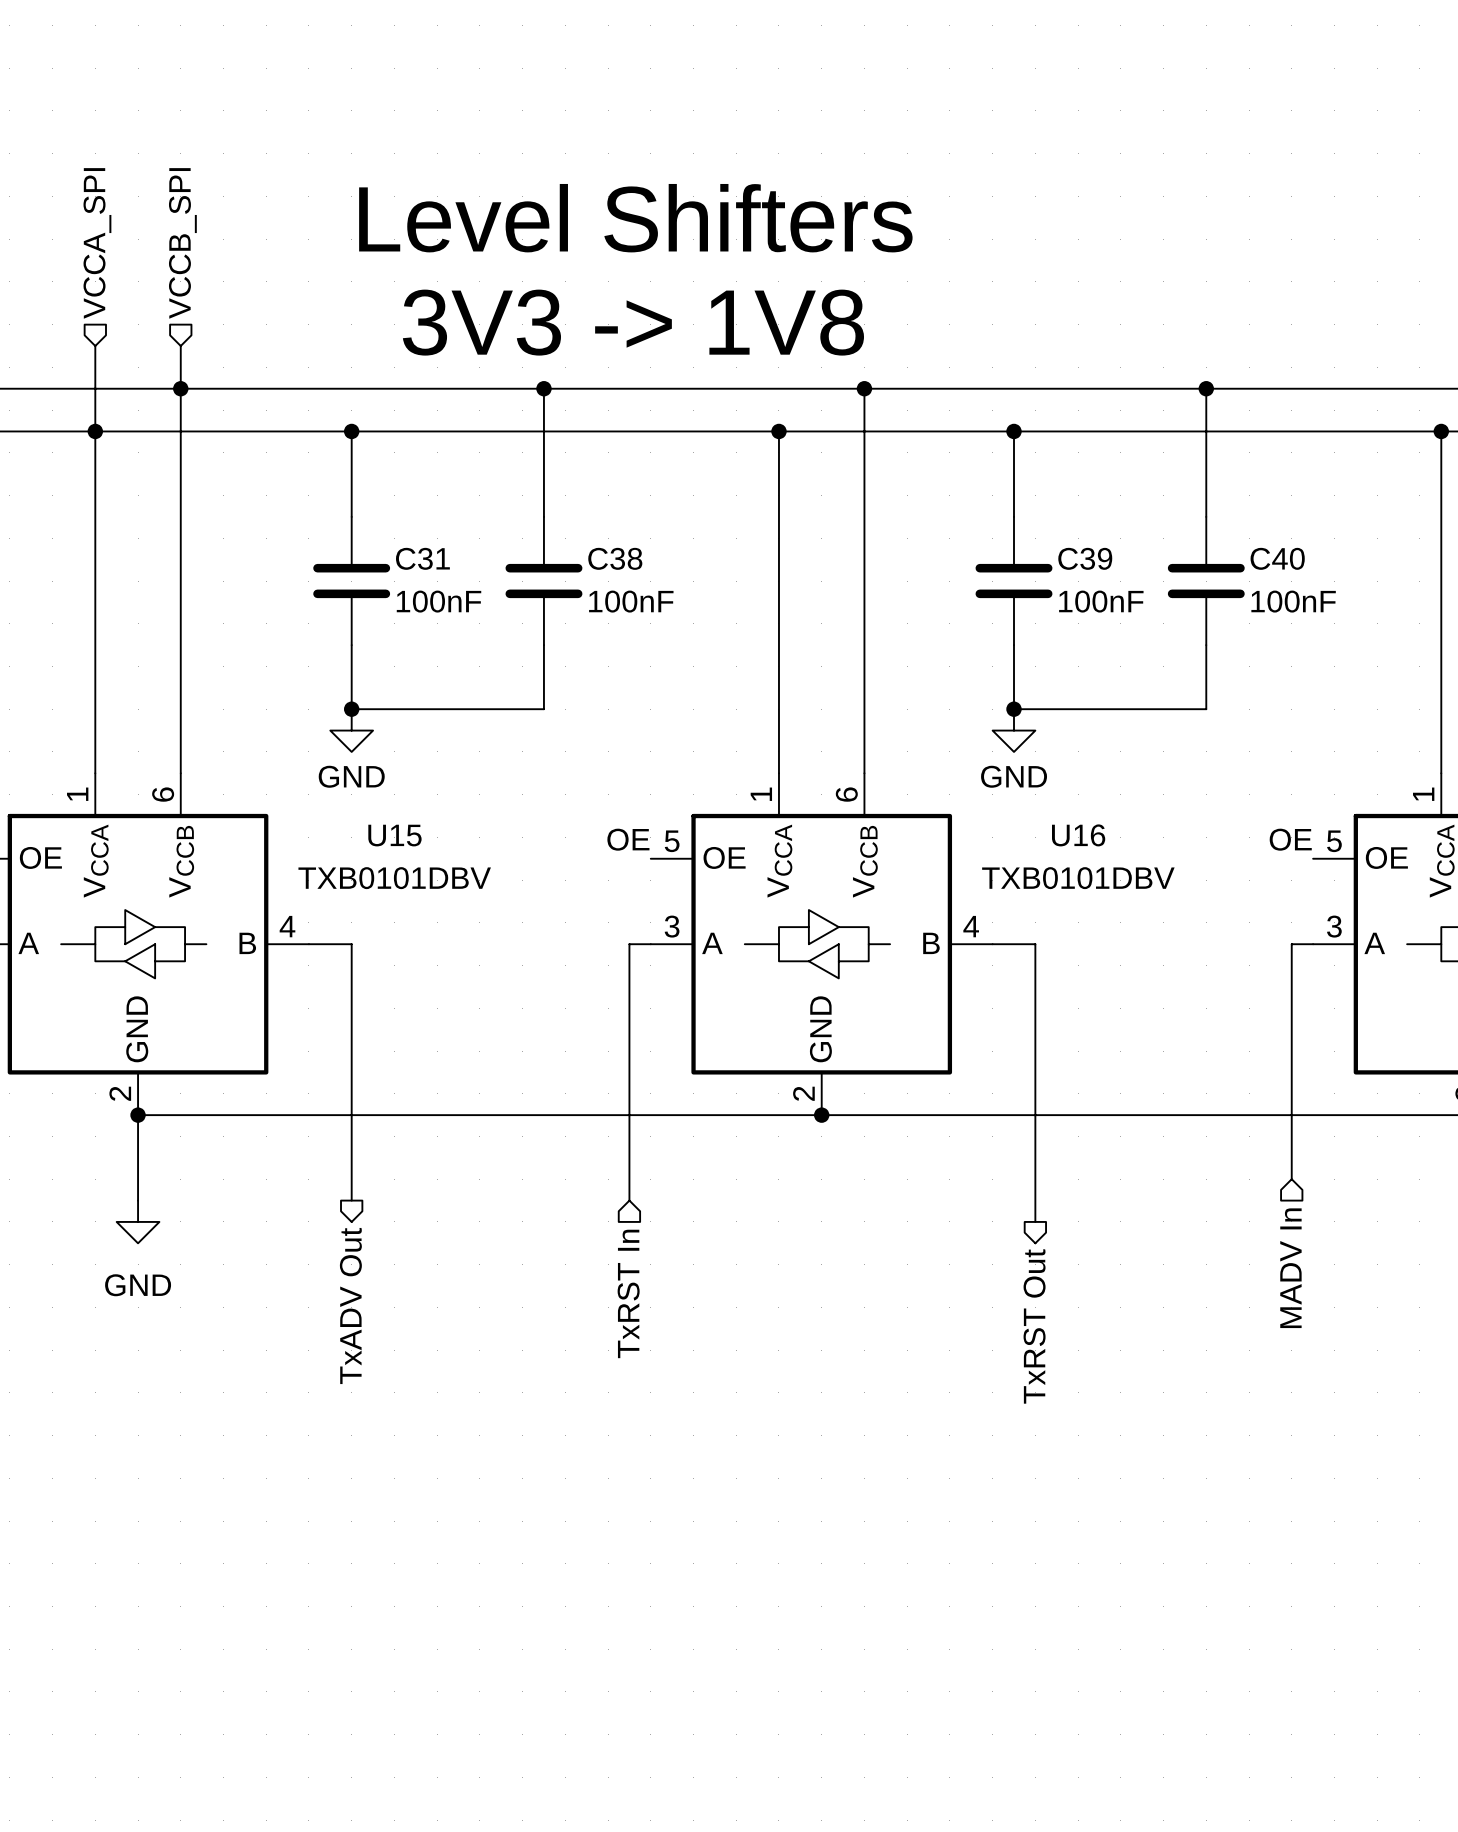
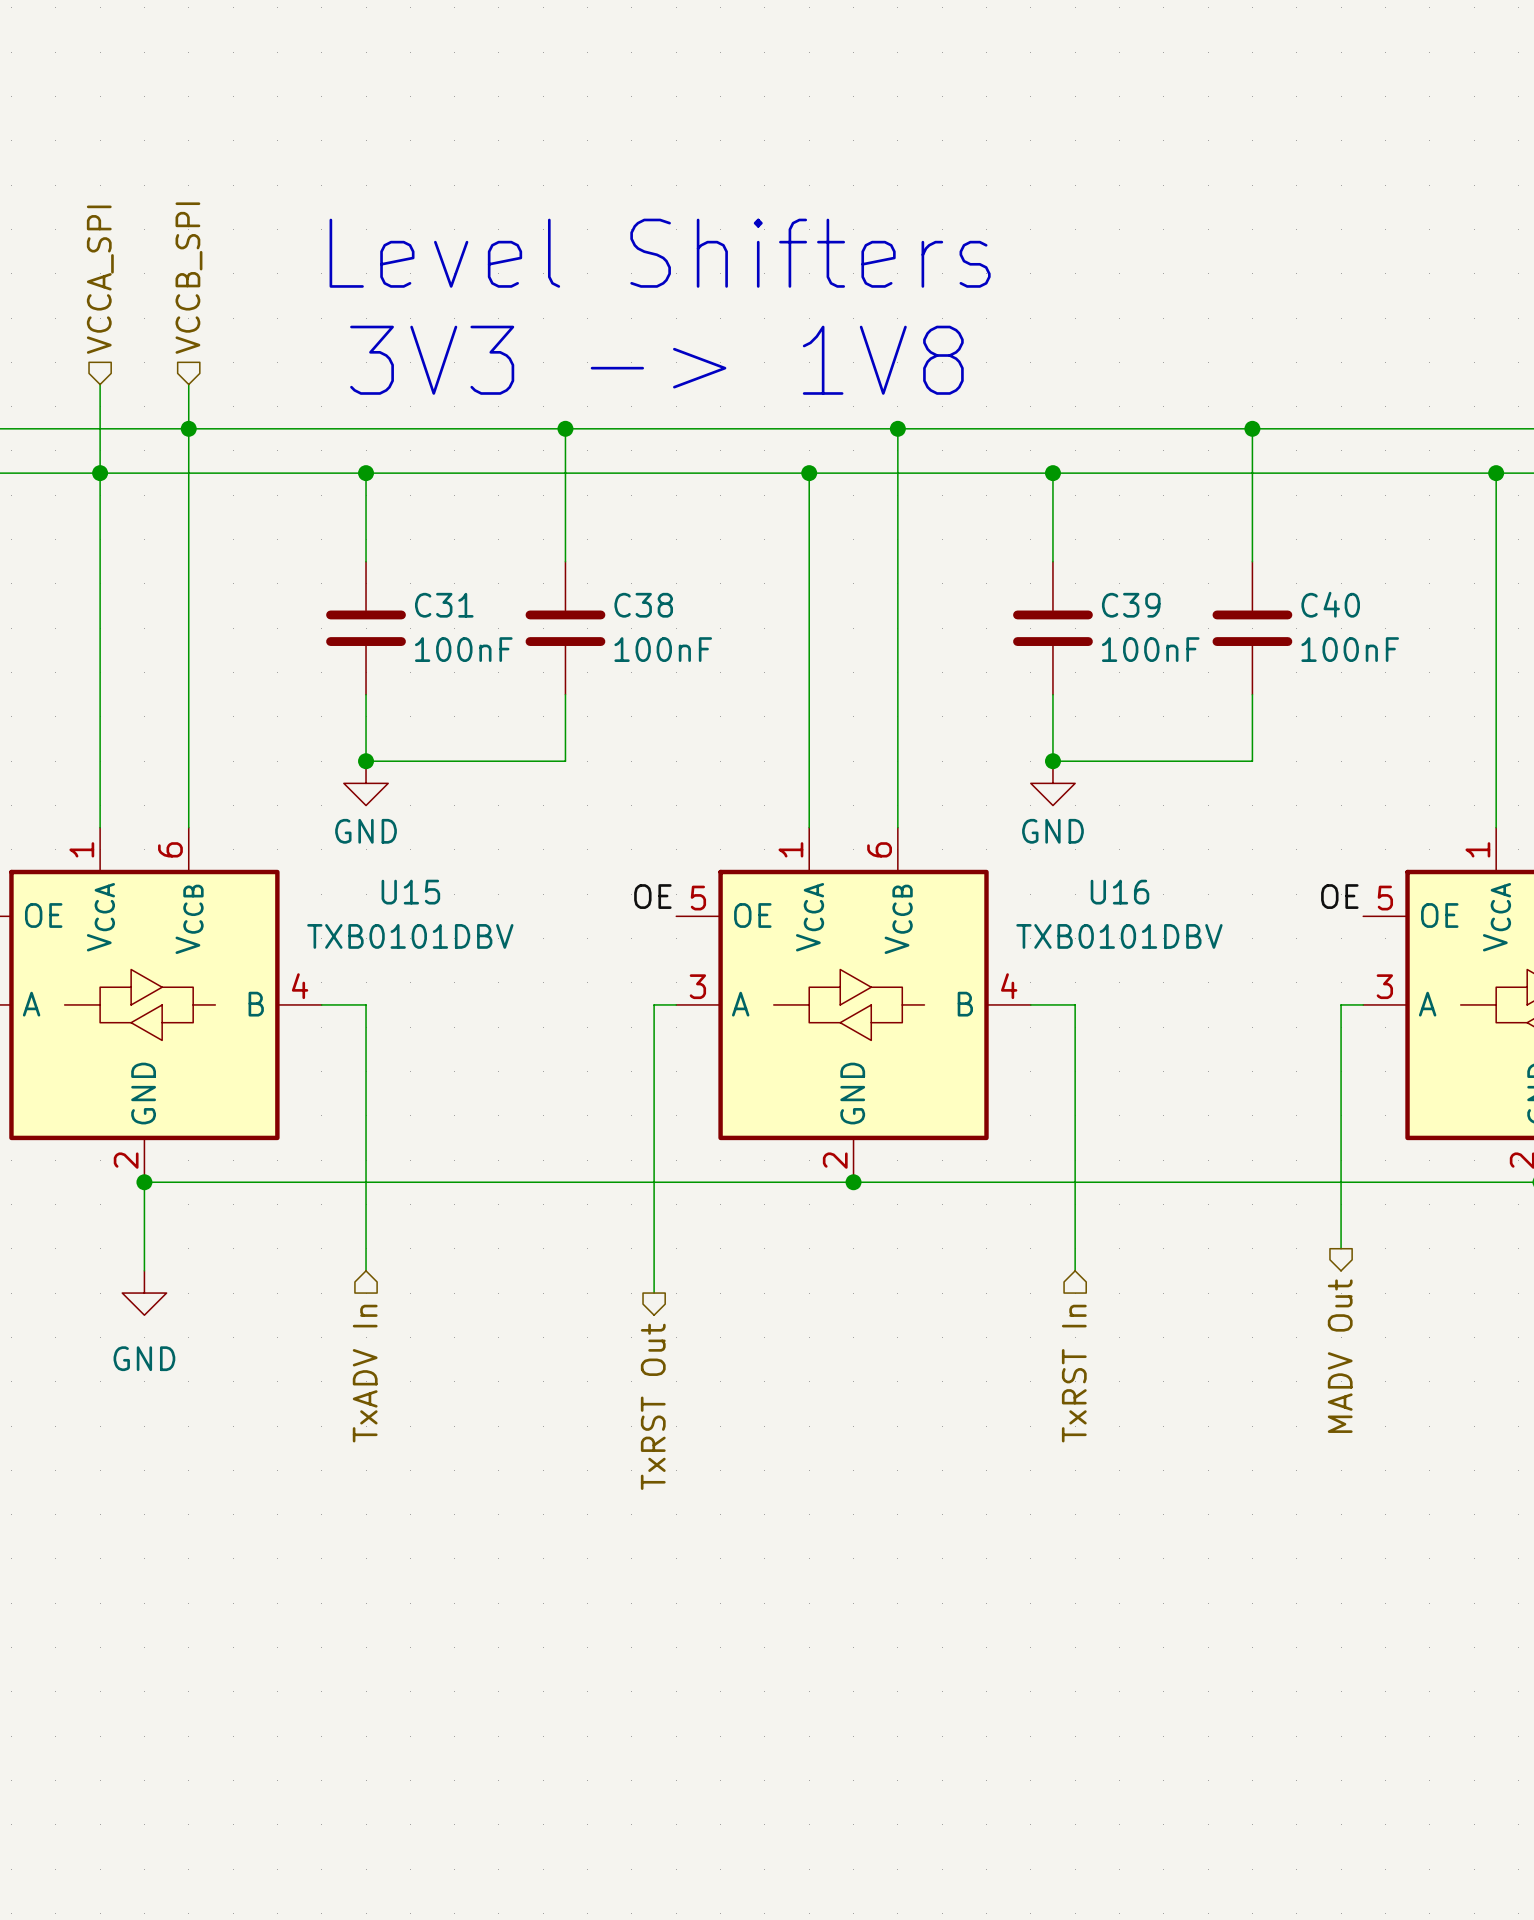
wire: (1035, 1200) (1035, 1221) -> (654, 1270) (654, 1293)
hierarchical label shape: input (1290, 1268) -> output (1340, 1356)
hierarchical label: MADV In (1290, 1268) -> MADV Out (1340, 1356)
hierarchical label position: TxRST In (628, 1293) -> TxRST In (1074, 1373)
hierarchical label shape: output (350, 1306) -> input (365, 1373)
hierarchical label: TxADV Out (350, 1306) -> TxADV In (365, 1373)
hierarchical label position: TxRST Out (1034, 1326) -> TxRST Out (653, 1406)

